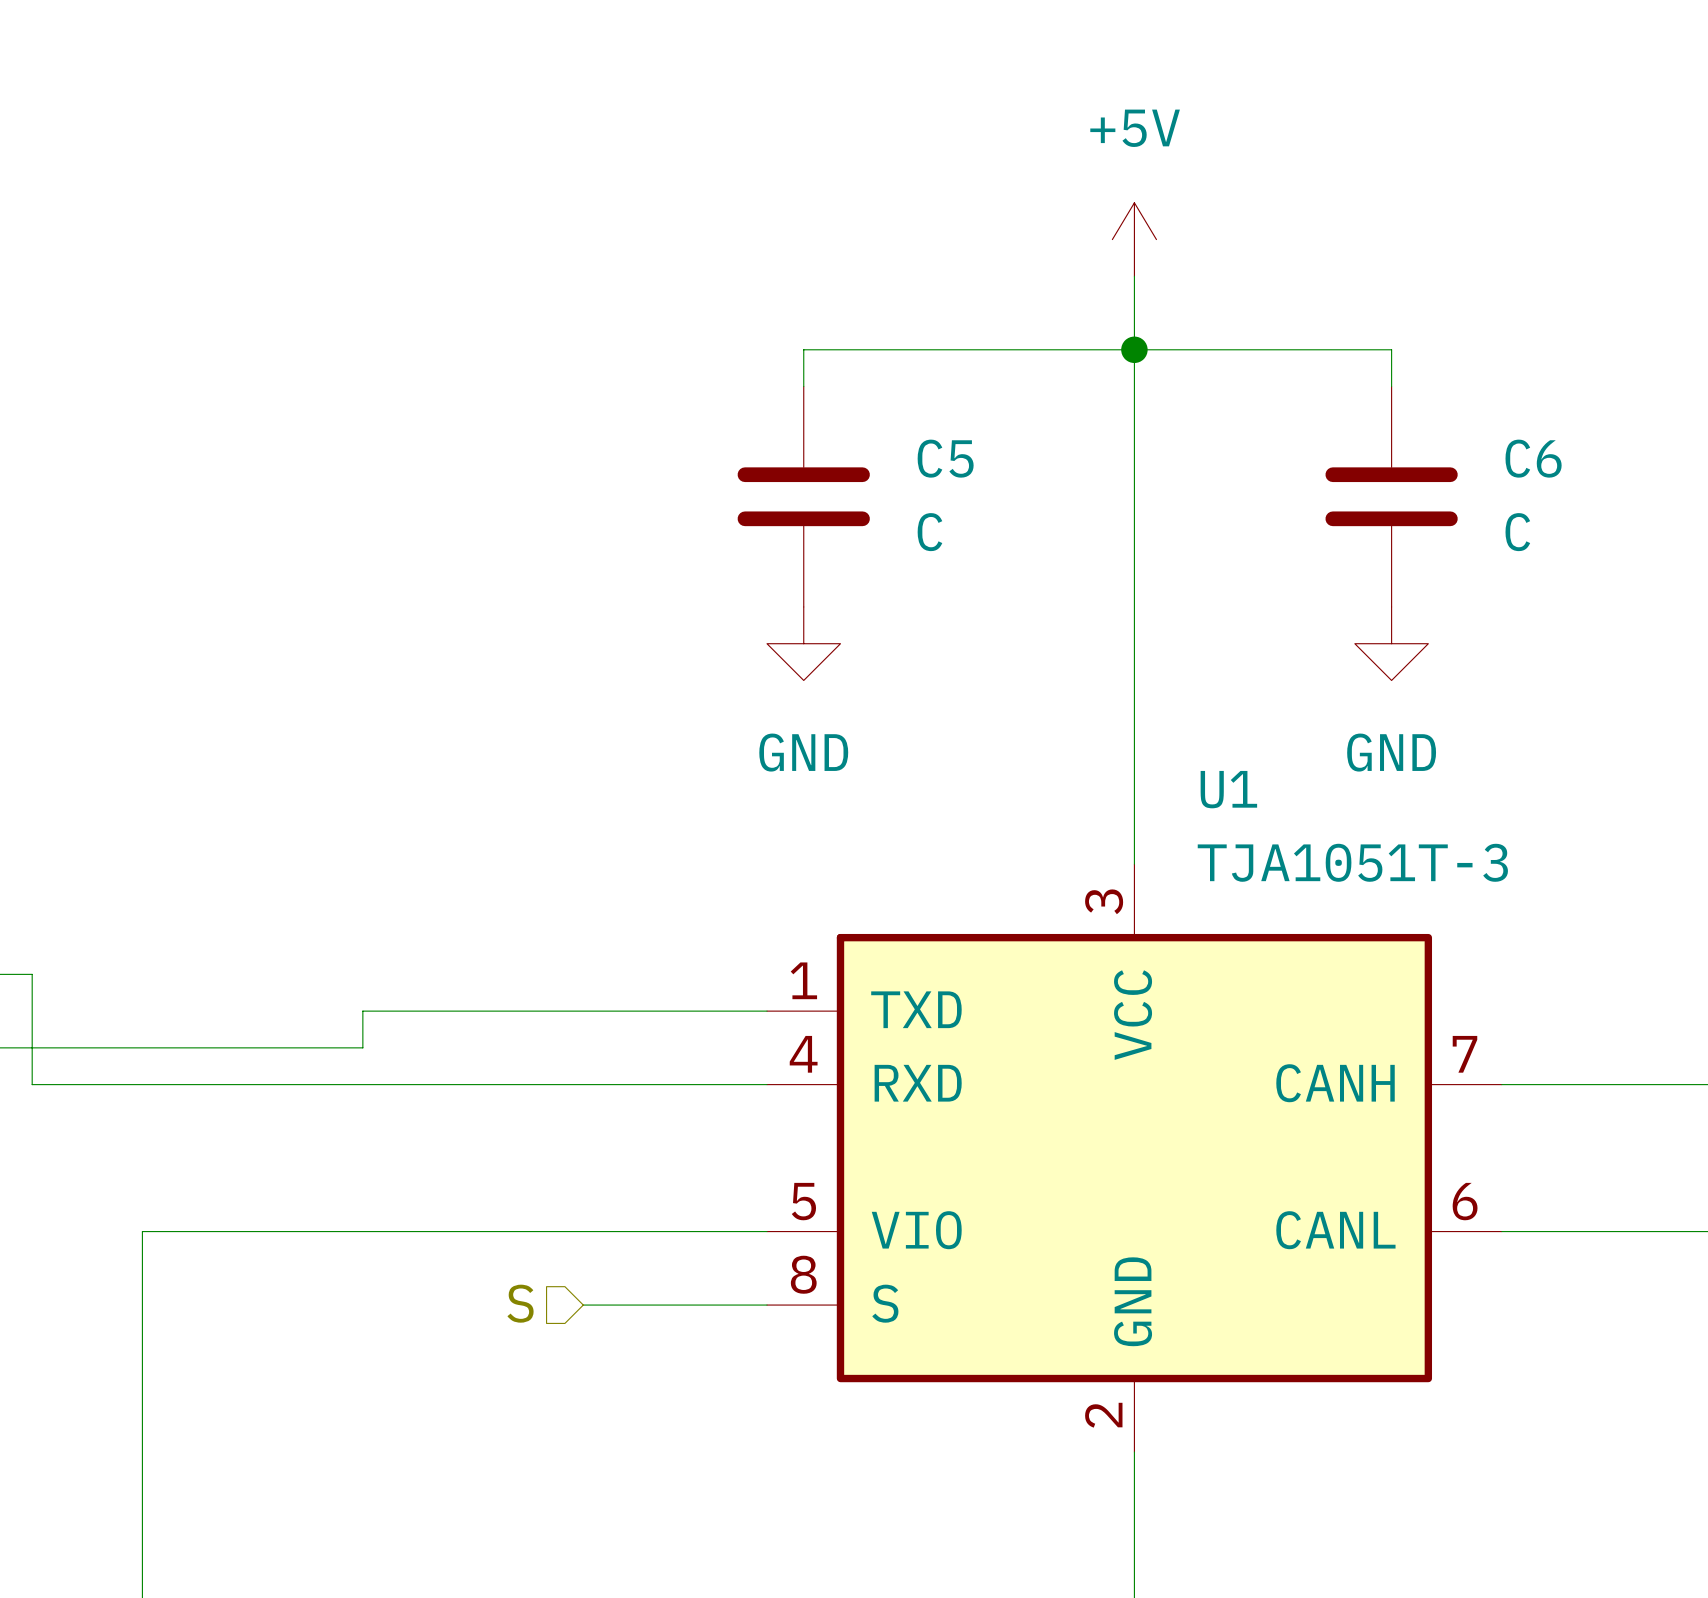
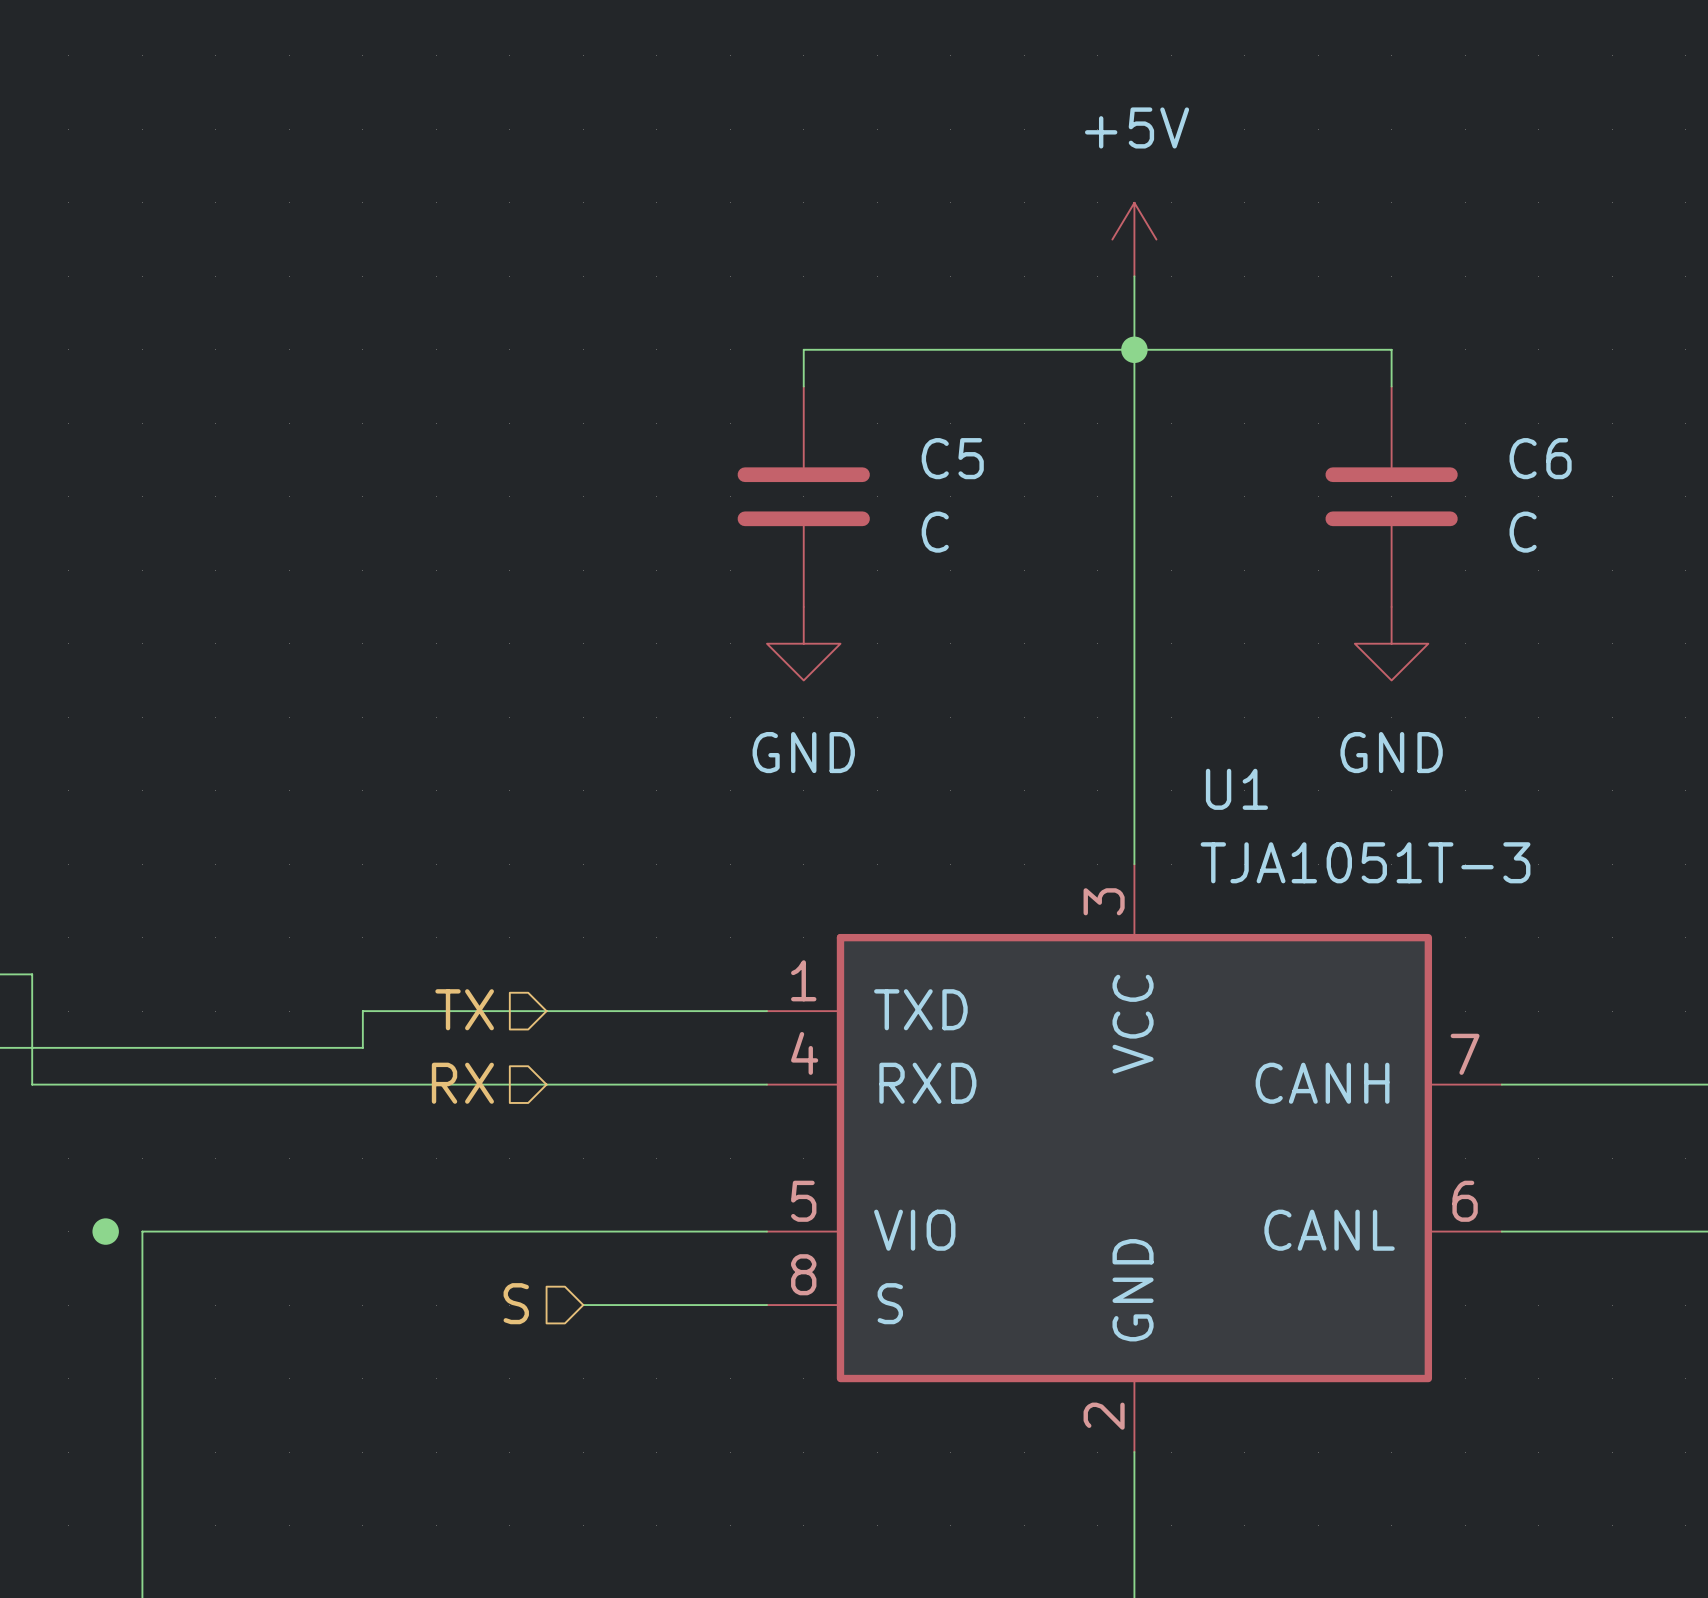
hierarchical label: none -> TX (464, 1009)
hierarchical label: none -> RX (462, 1083)
junction: none -> (105, 1231)

